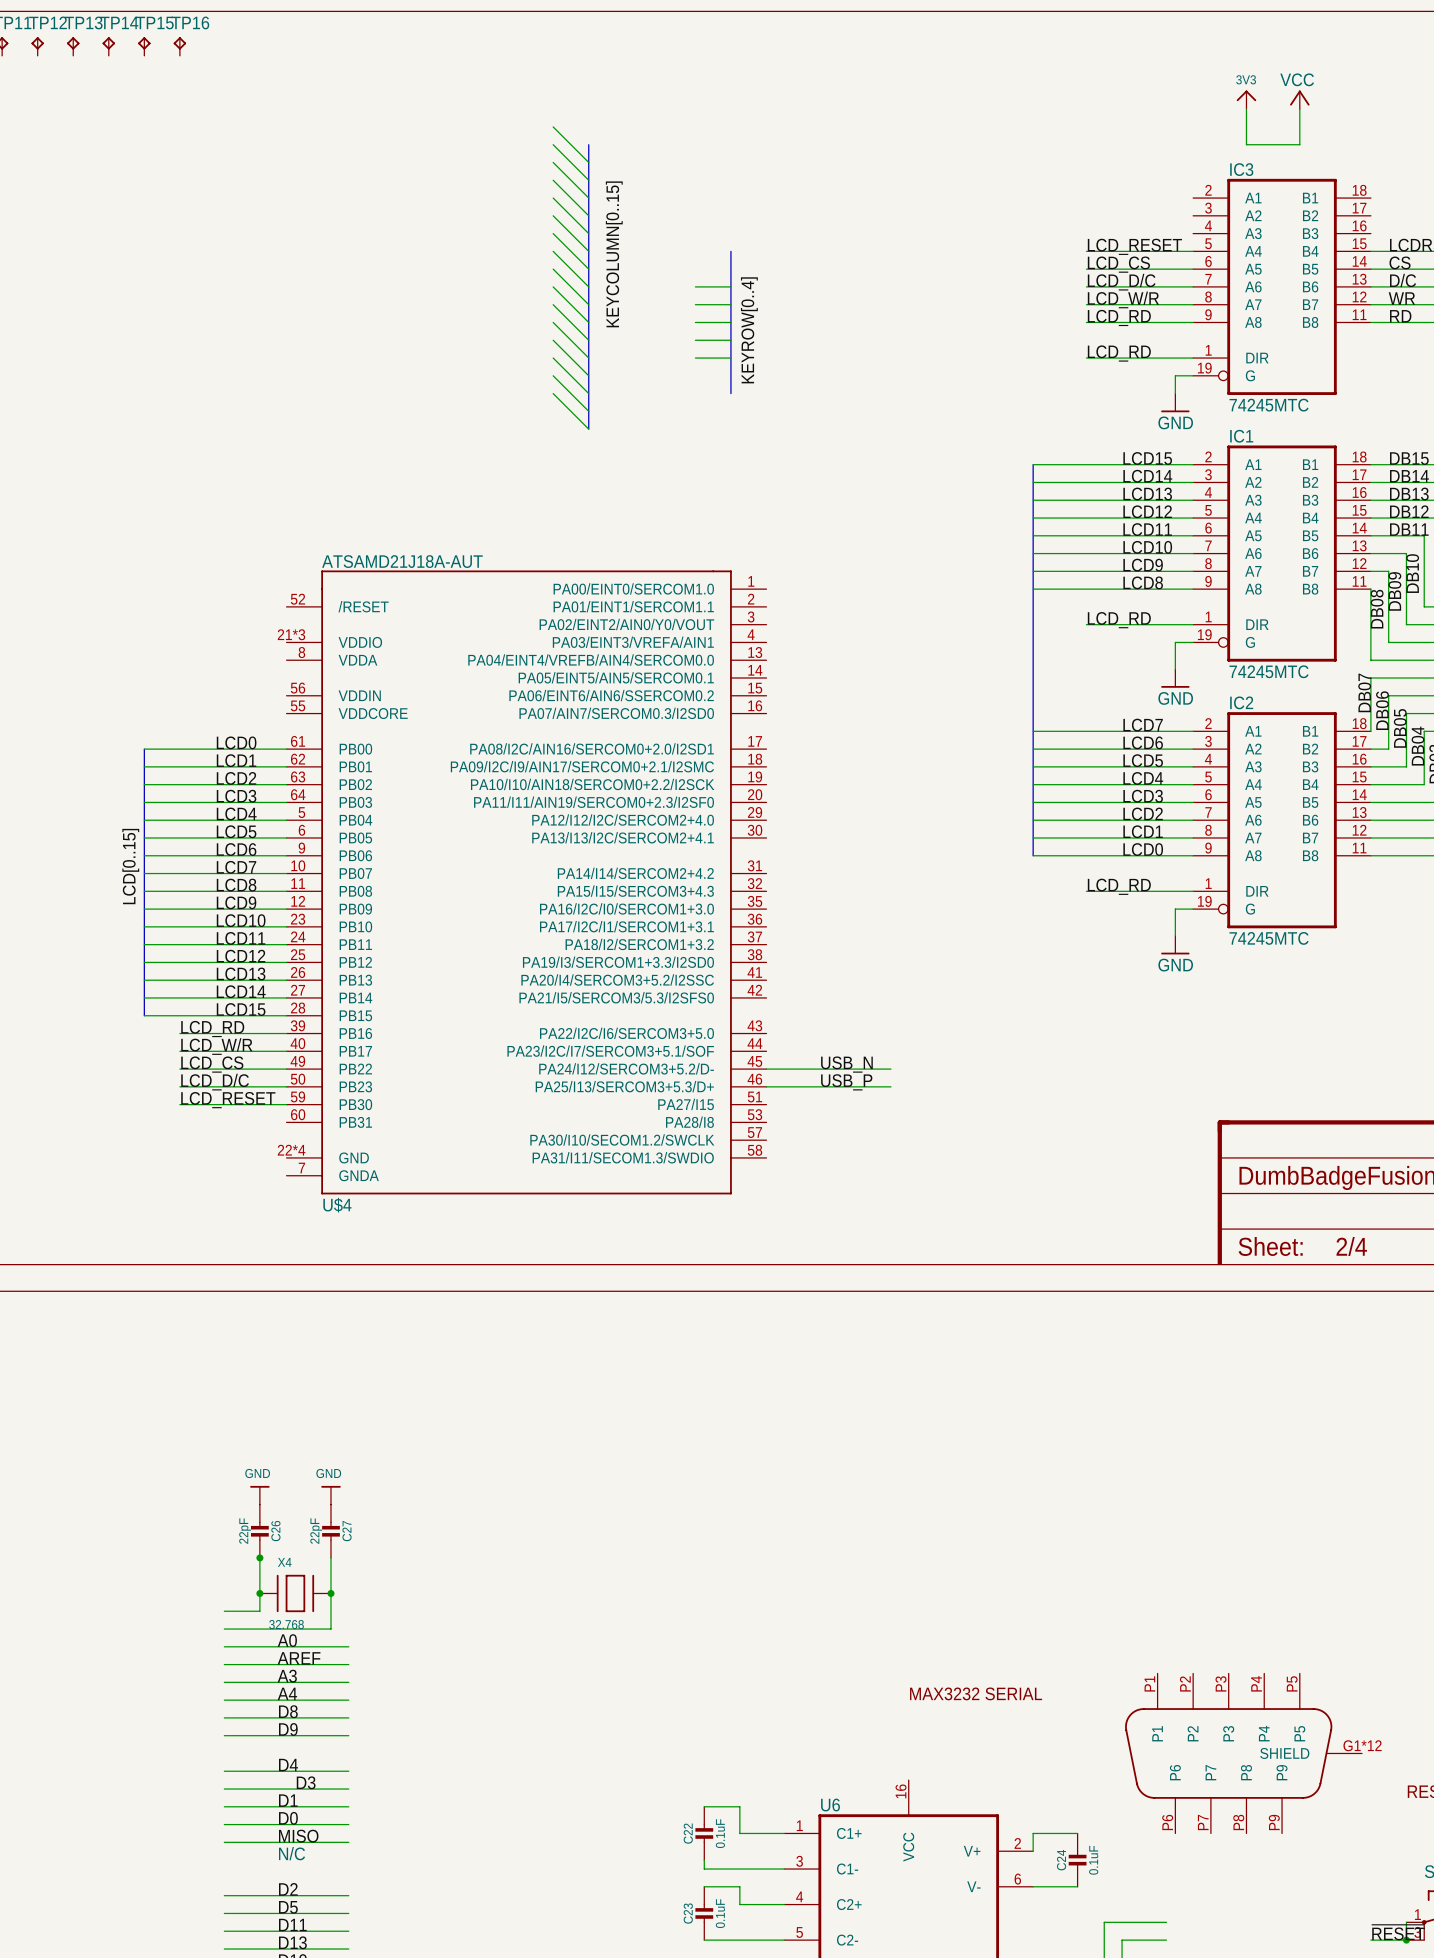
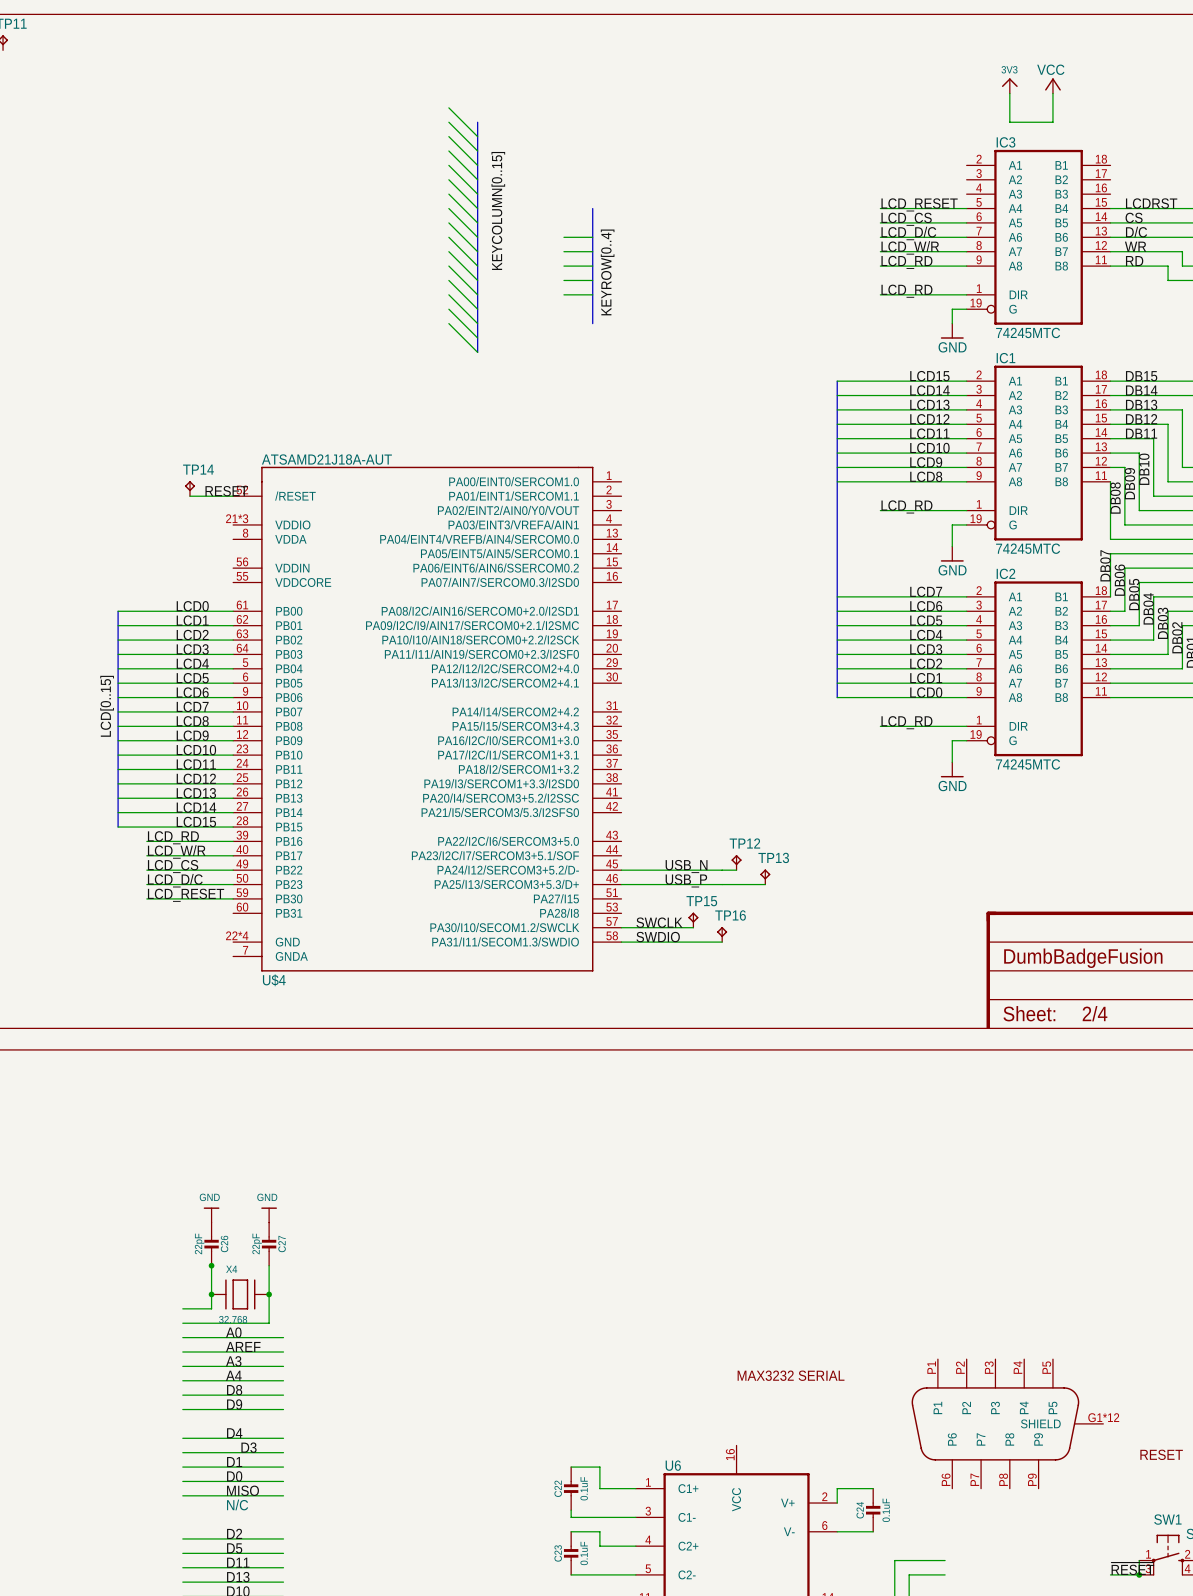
TP12 position: (37, 46) -> (736, 862)
TP13 position: (73, 46) -> (765, 877)
TP14 position: (108, 46) -> (189, 488)
TP15 position: (144, 46) -> (693, 920)
TP16 position: (179, 46) -> (722, 934)
label: none -> RESET (226, 491)
wire: none -> (189, 496) (233, 496)
wire: none -> (722, 870) (736, 870)
wire: none -> (722, 884) (765, 884)
label: none -> SWCLK (659, 922)
wire: none -> (621, 927) (693, 927)
label: none -> SWDIO (658, 937)
wire: none -> (621, 942) (722, 942)

